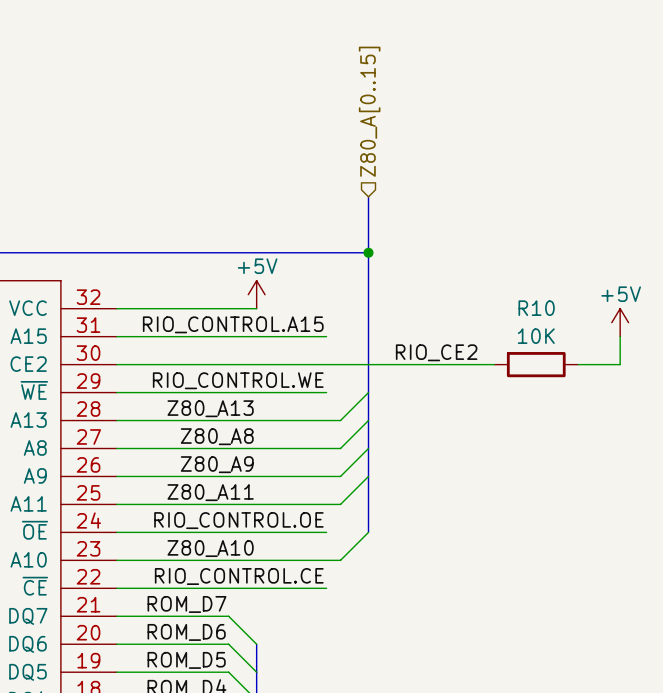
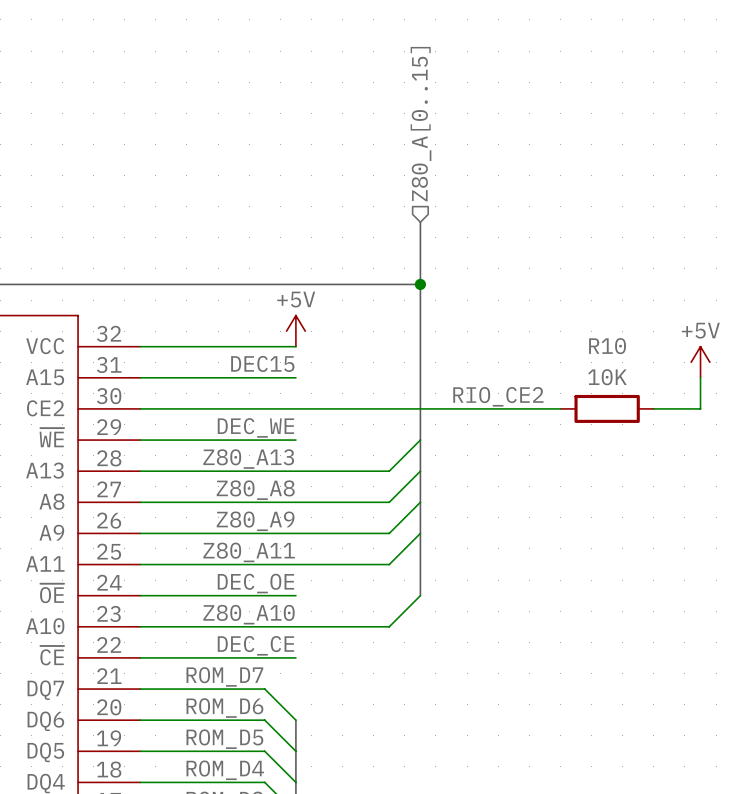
label: none -> DEC15 (262, 363)
label: RIO_CONTROL.A15 (233, 324) -> none
wire: (256, 336) (326, 336) -> none
label: none -> DEC_WE (255, 427)
label: RIO_CONTROL.WE (238, 380) -> none
wire: (256, 392) (326, 392) -> none
label: none -> DEC_OE (255, 583)
label: RIO_CONTROL.OE (238, 520) -> none
wire: (256, 532) (326, 532) -> none
label: none -> DEC_CE (255, 645)
label: RIO_CONTROL.CE (239, 576) -> none
wire: (256, 588) (326, 588) -> none

